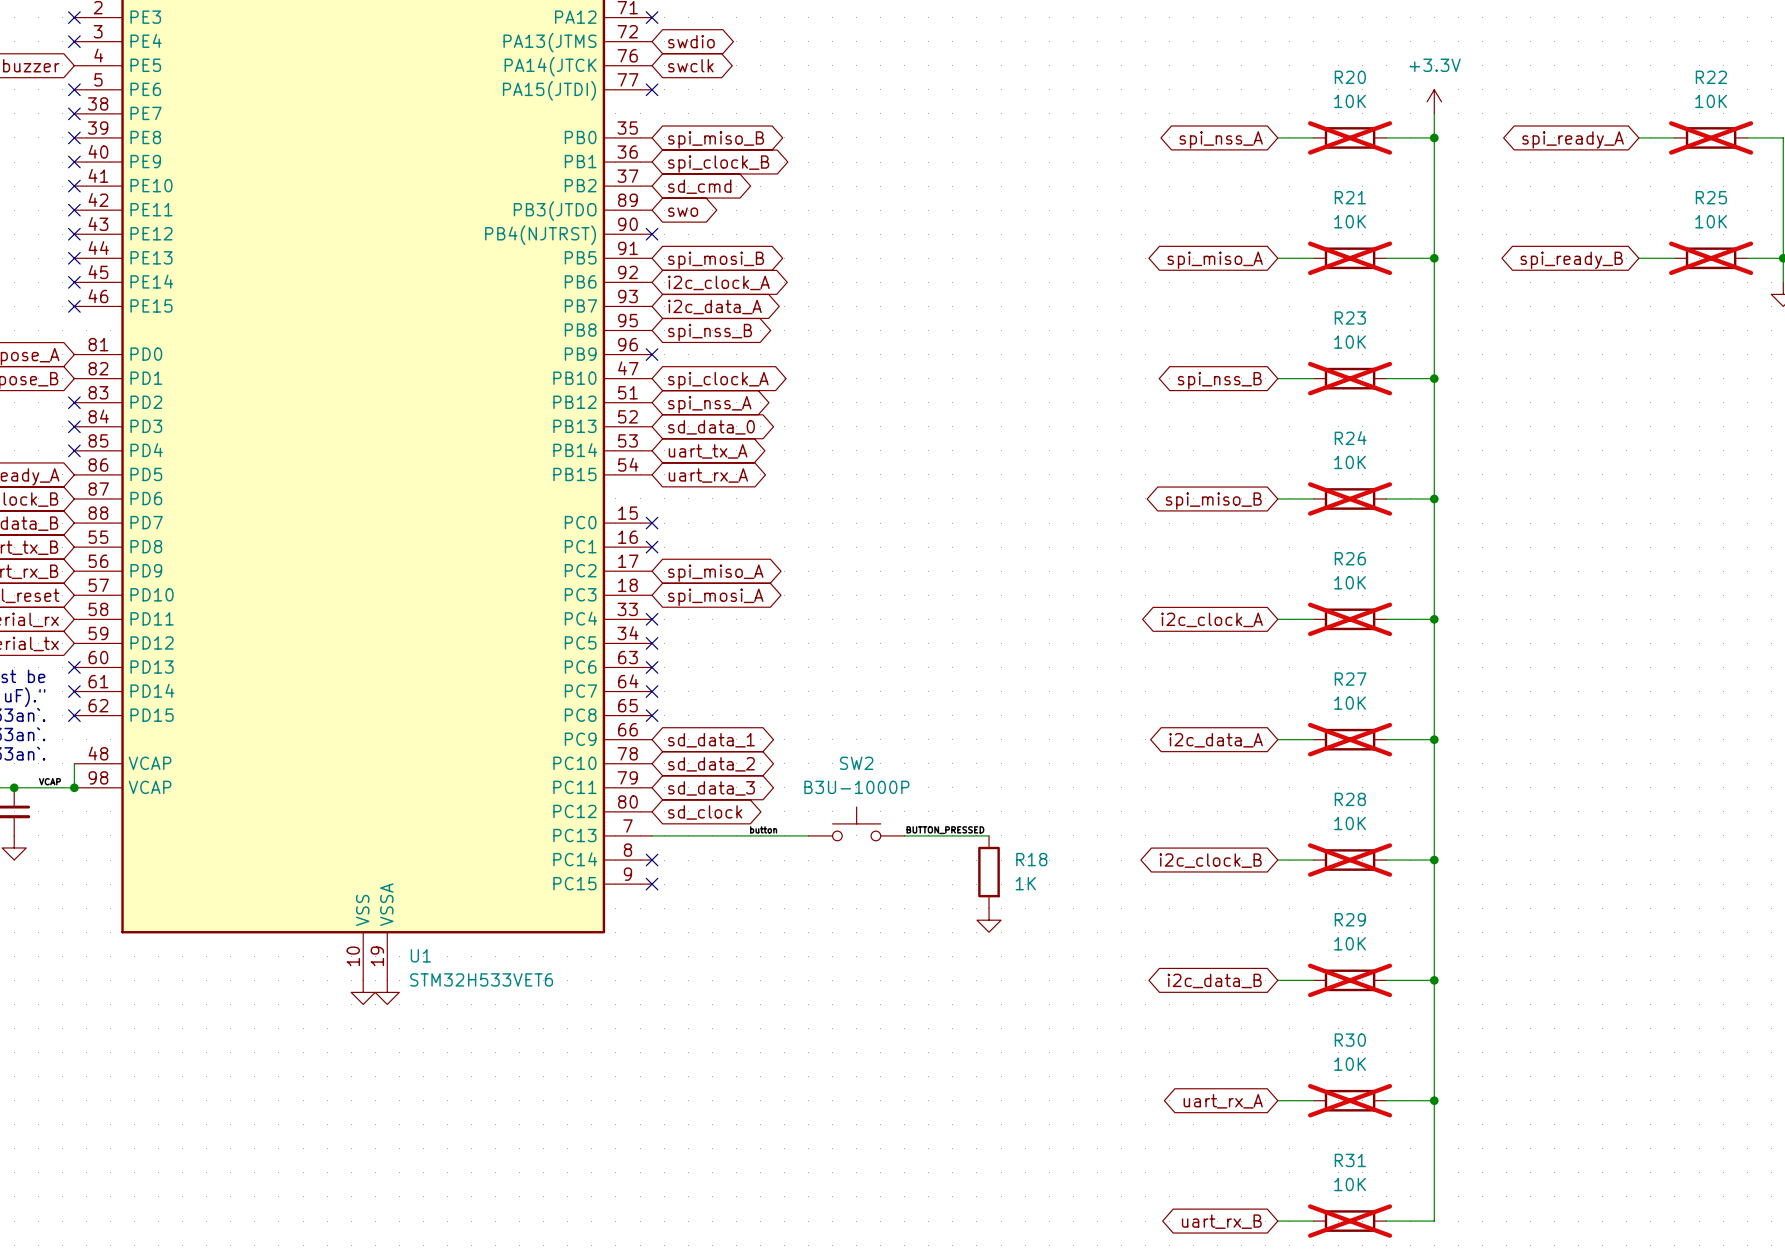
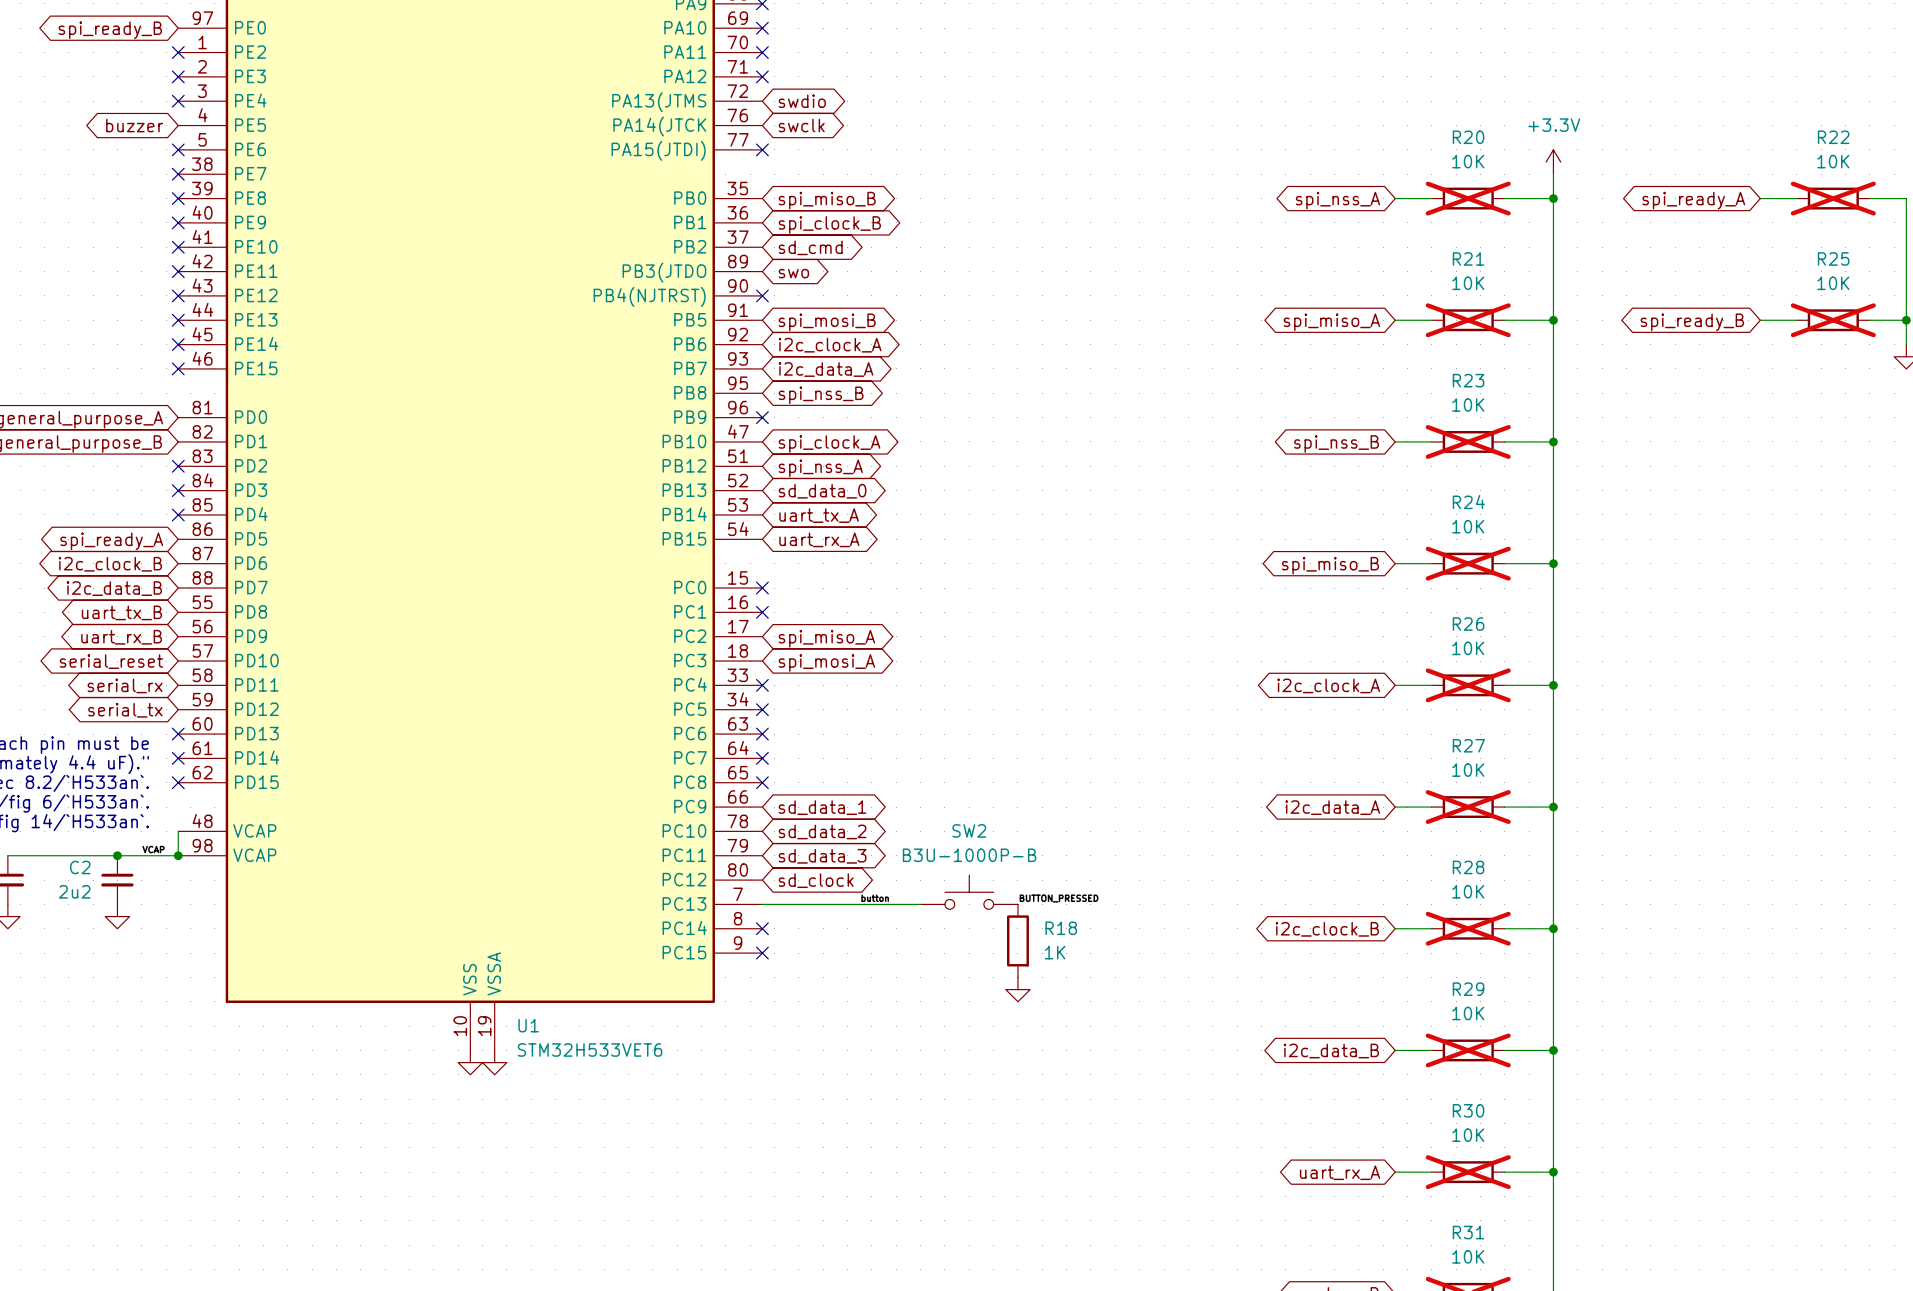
SW2 value: B3U-1000P (856, 787) -> B3U-1000P-B (969, 855)
wire: (904, 835) (989, 835) -> none
R18 position: (989, 872) -> (1017, 940)
power symbol position: (989, 920) -> (1017, 989)

